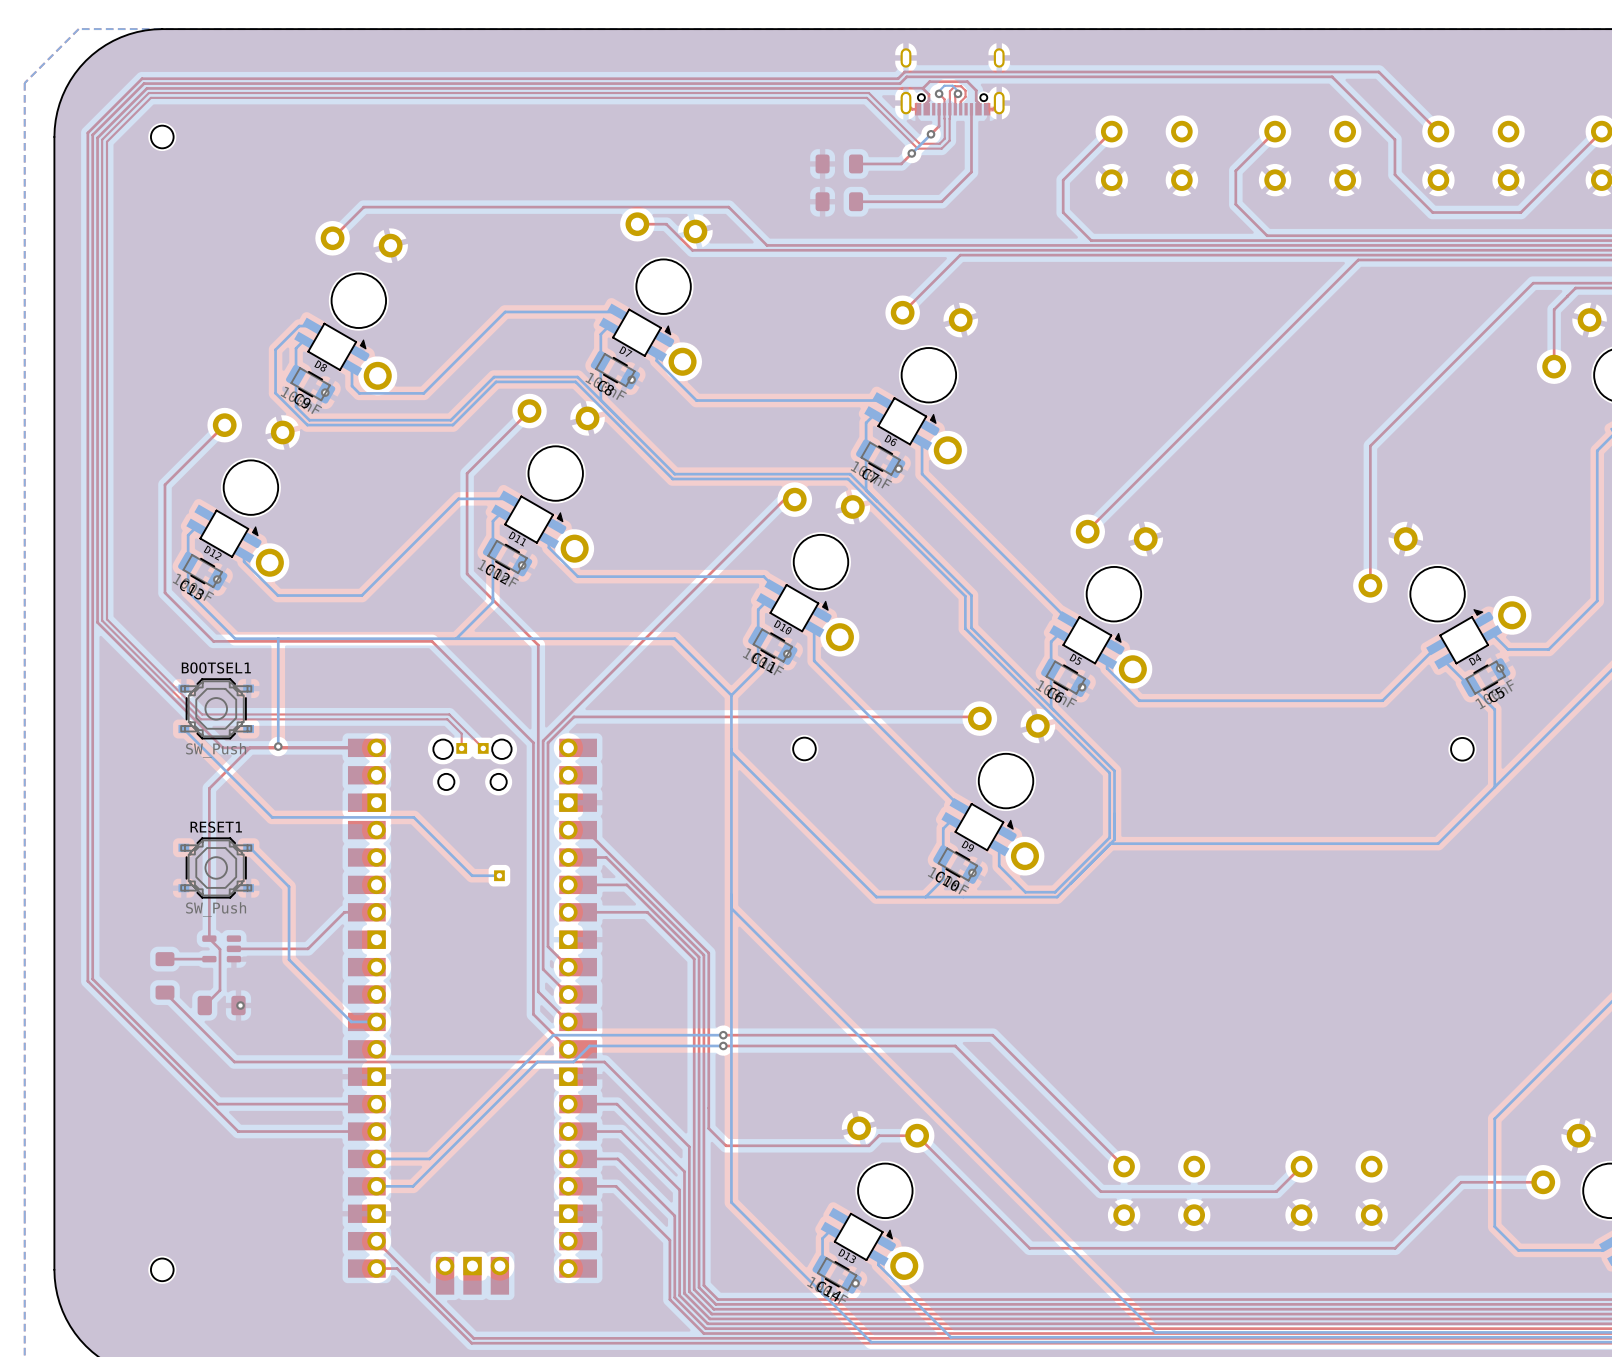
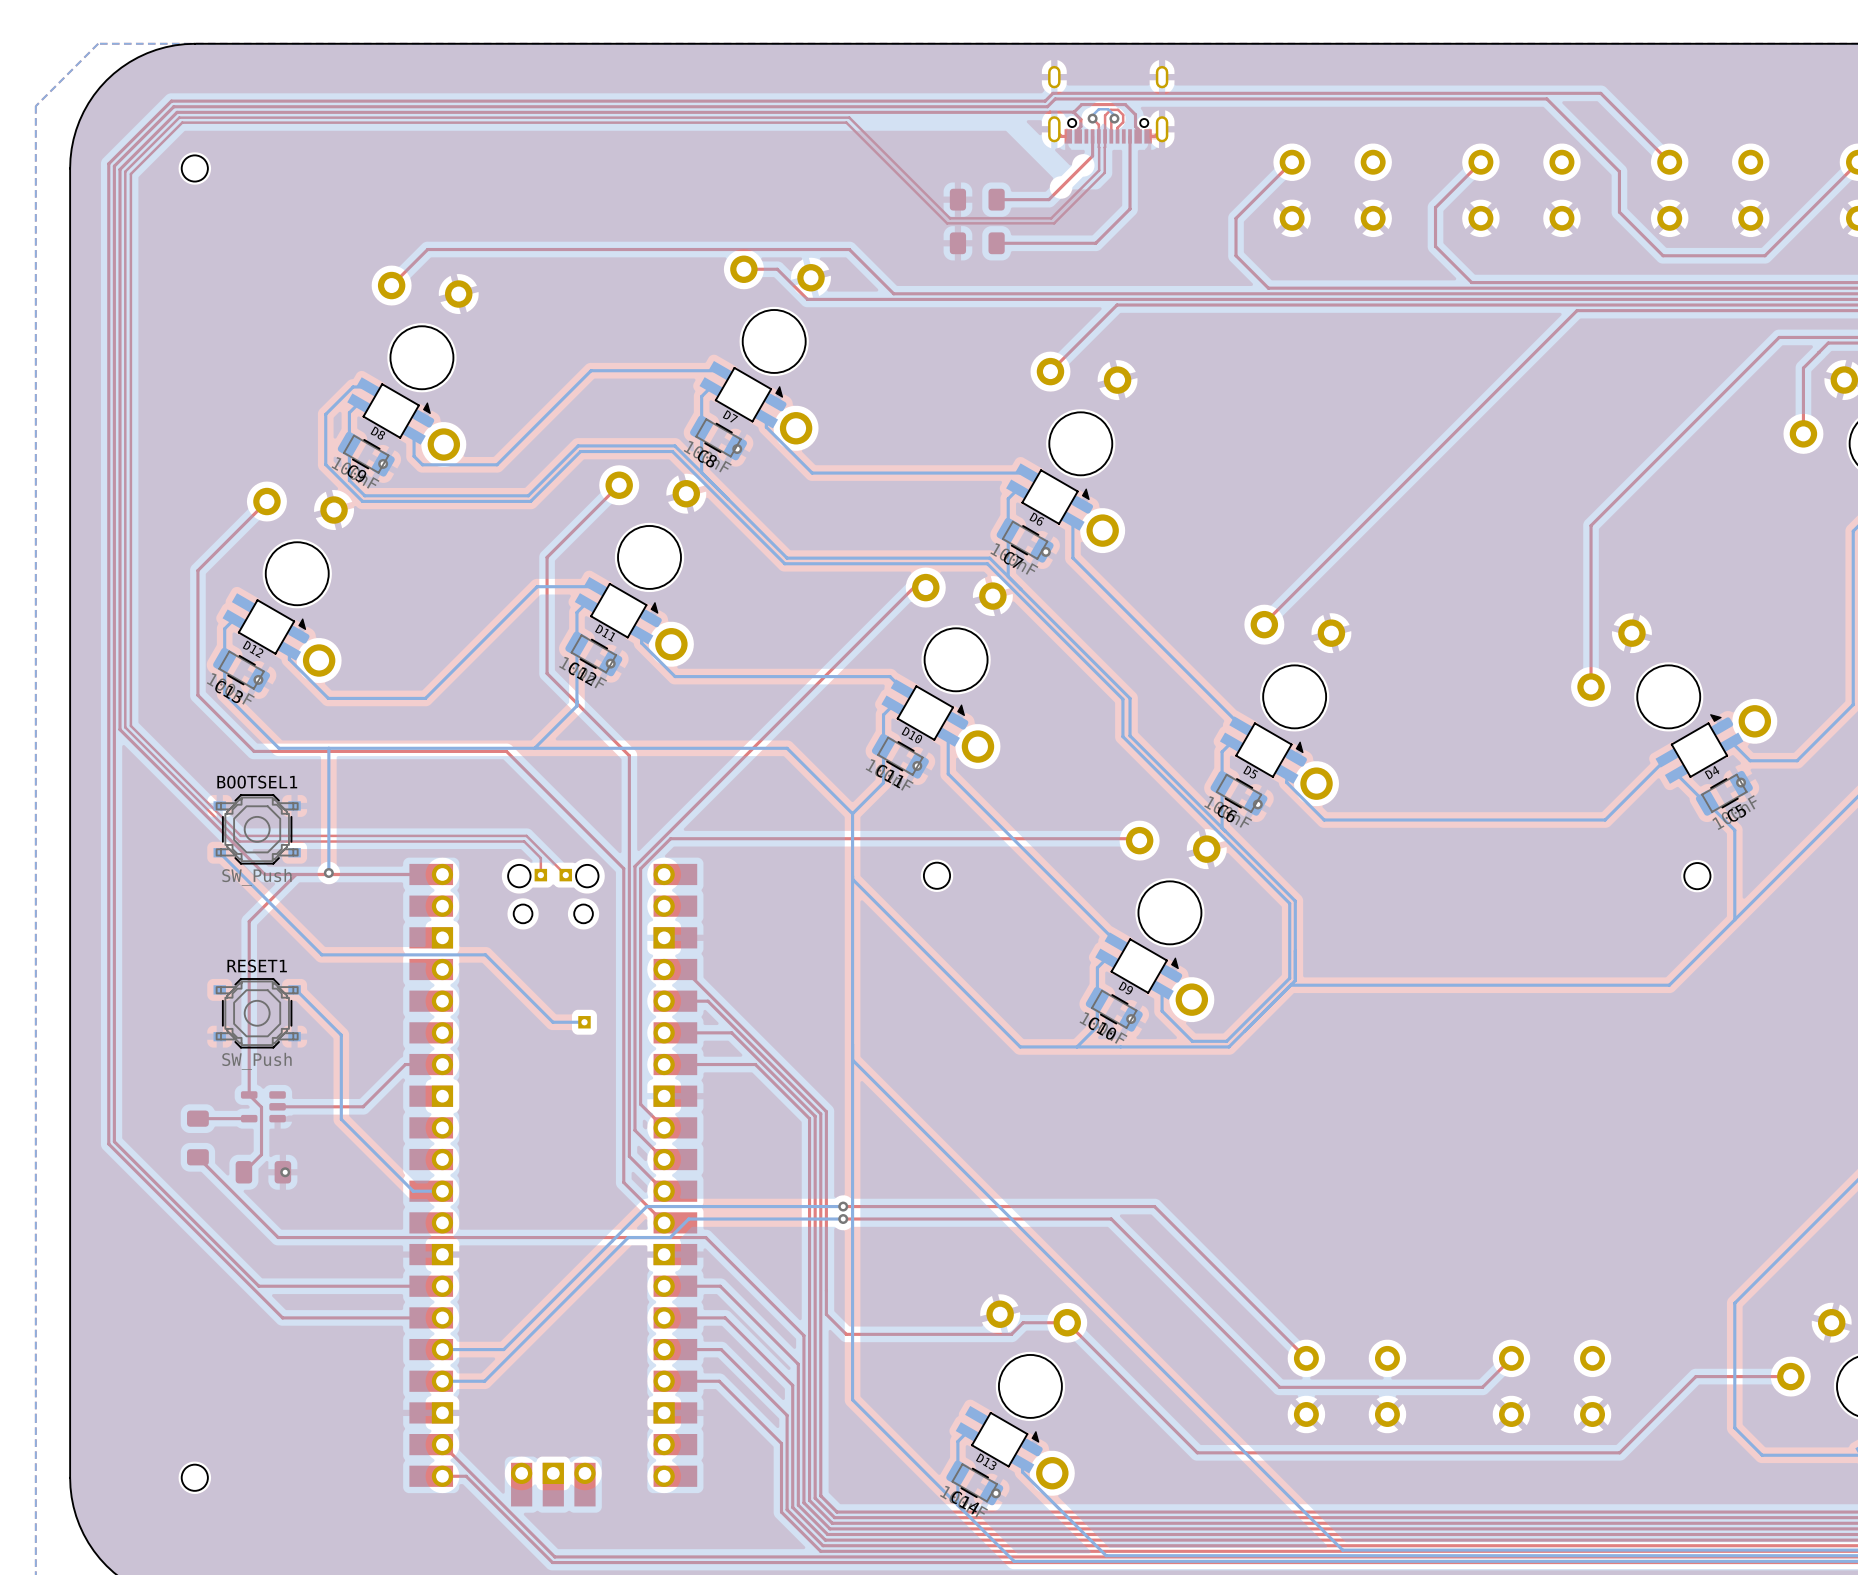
top track: (728, 93) (868, 93) (919, 143) (939, 143) -> (849, 117) (950, 218) (1051, 218) (1093, 176)
top track: (150, 97) (866, 97) (917, 148) (941, 148) -> (181, 123) (846, 122) (947, 223) (1054, 223) (1095, 181)
bottom track: (931, 134) (911, 153) -> none
via: (931, 134) -> none
top track: (911, 153) (901, 163) -> (1092, 156) (1048, 199)
via: (911, 153) -> none

